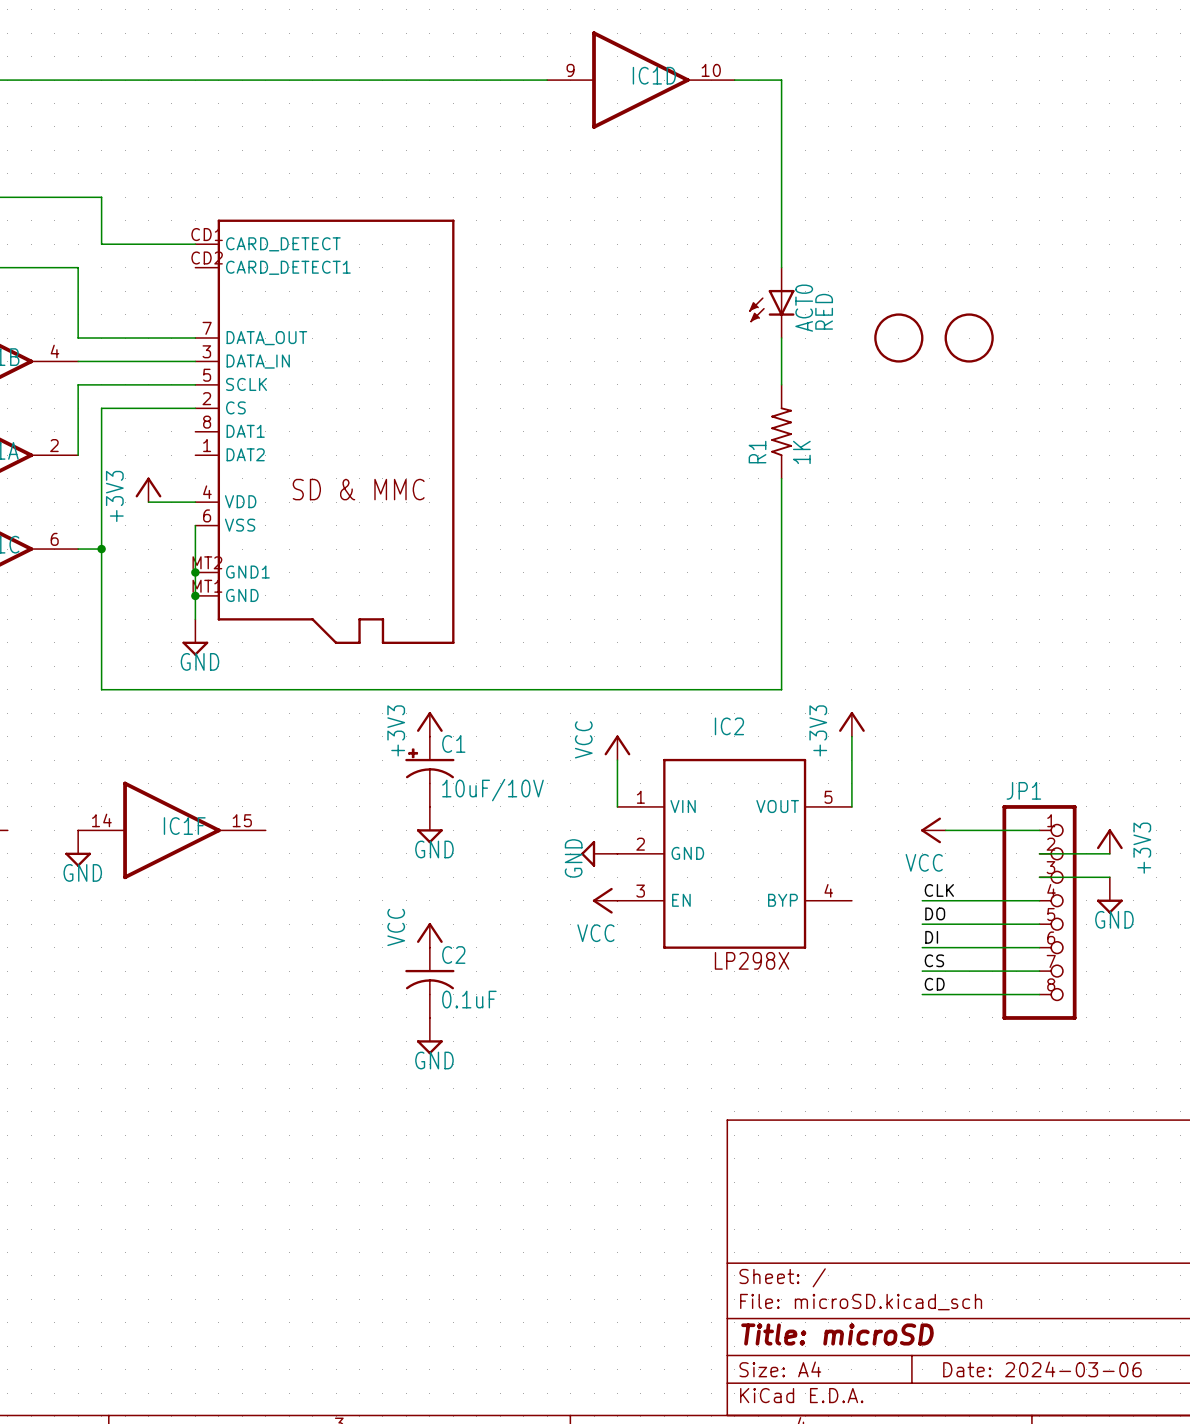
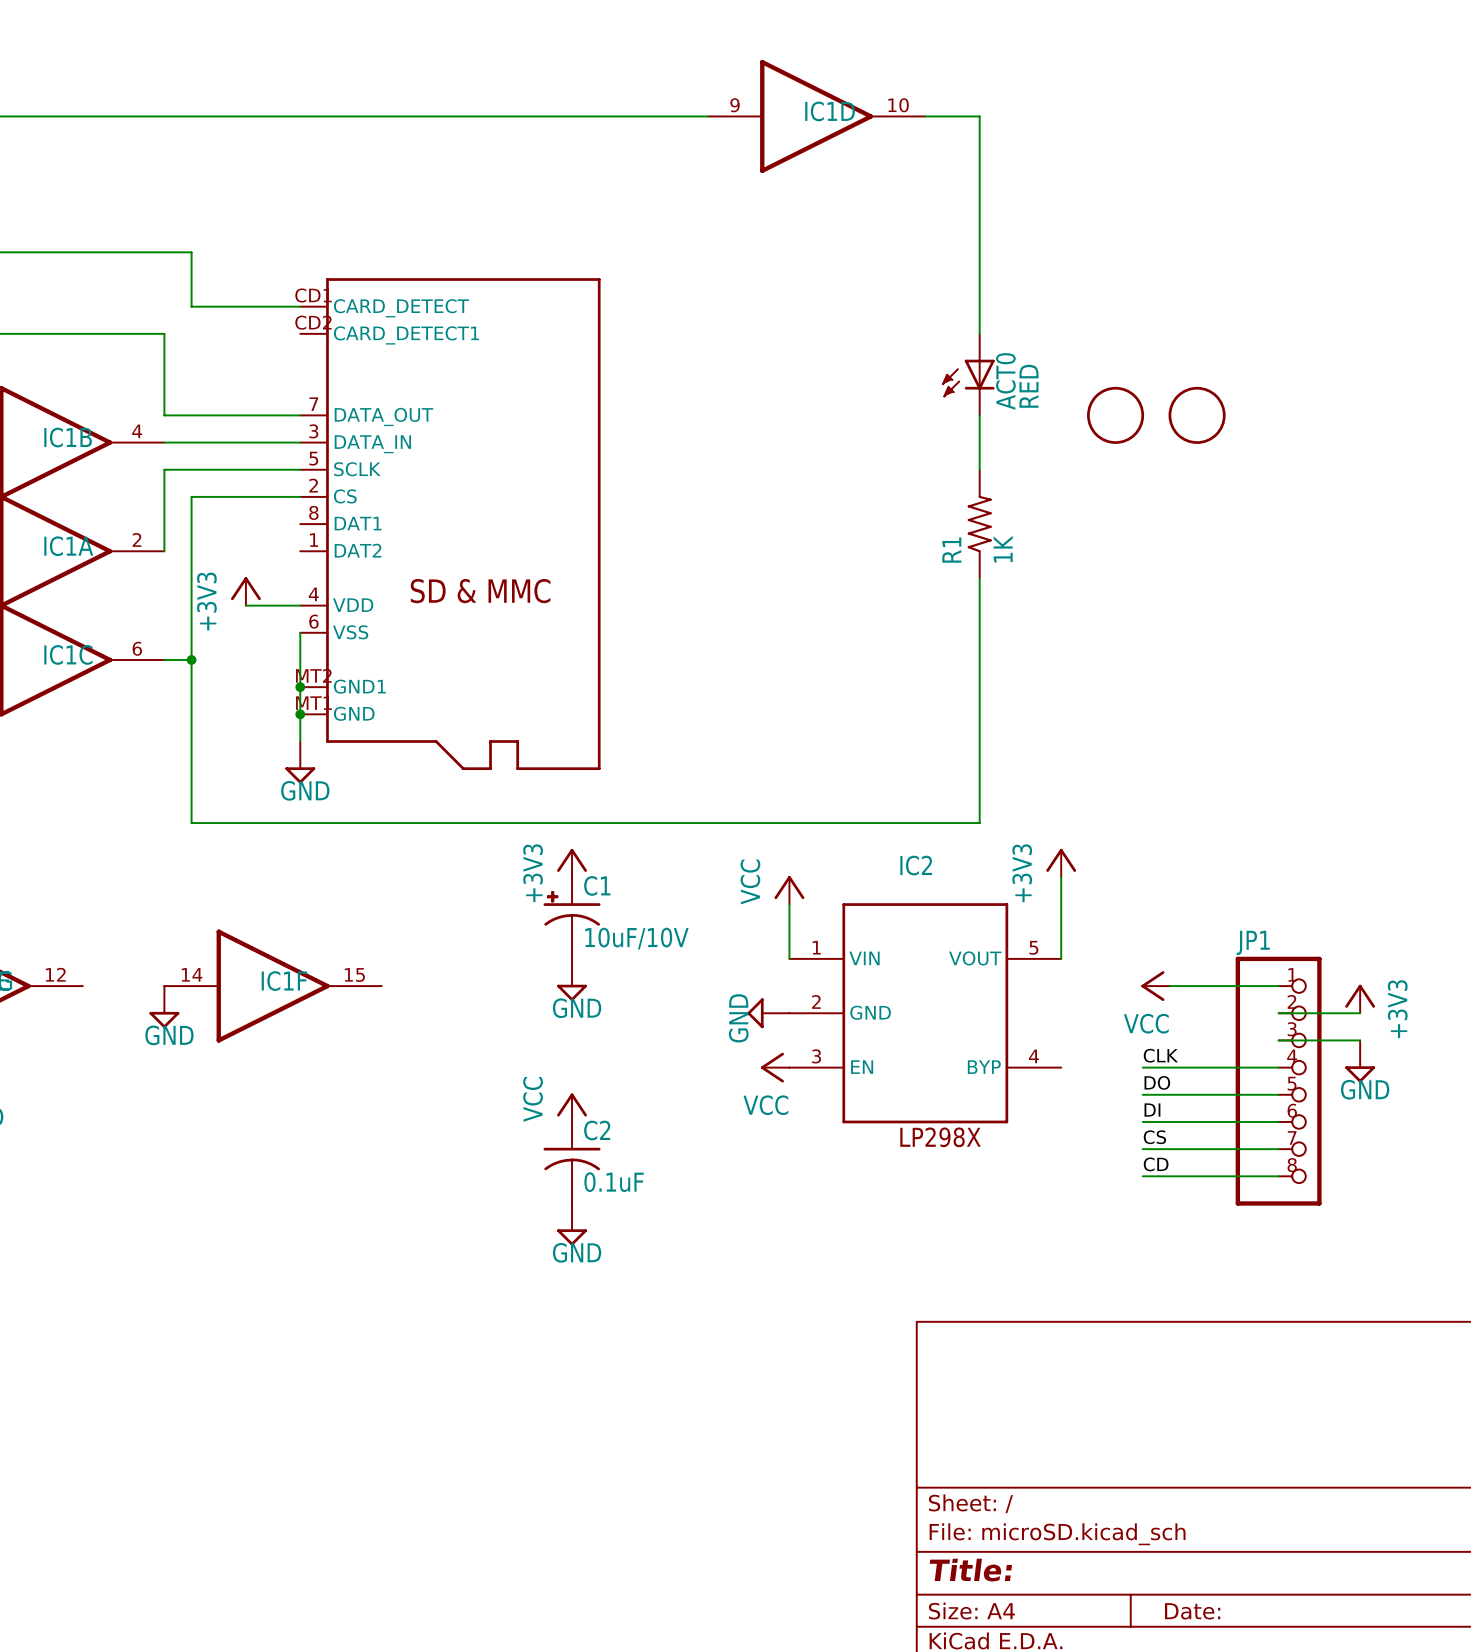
title block: Title: microSD (837, 1334) -> Title: (970, 1570)
title block: Date: 2024-03-06 (1042, 1369) -> Date: (1192, 1611)

